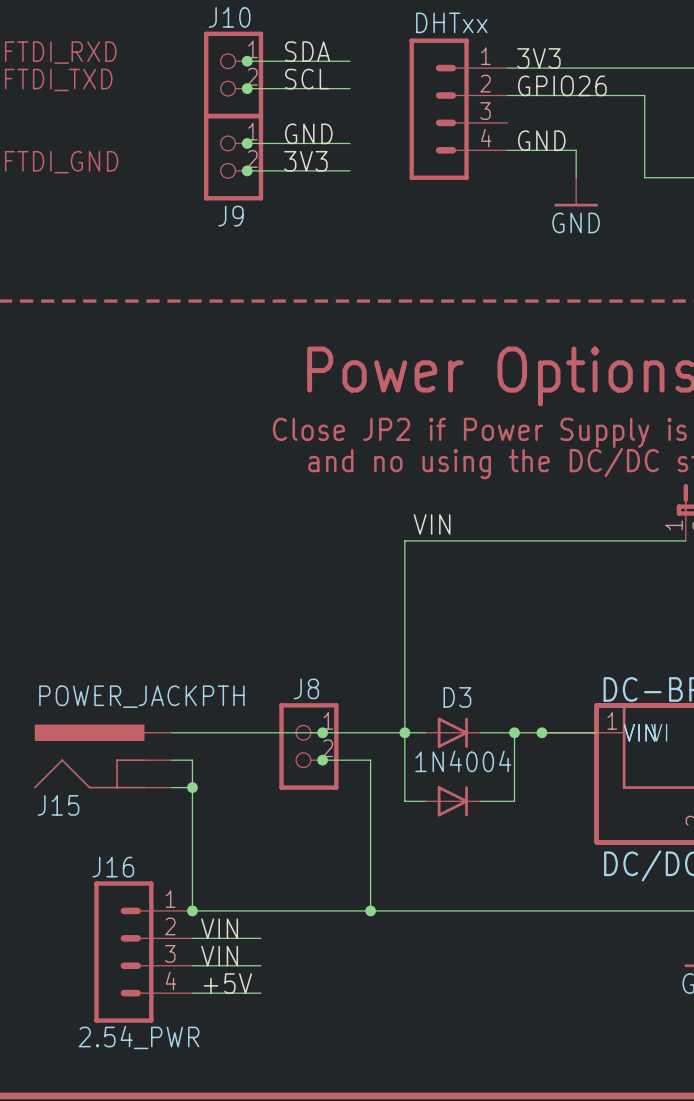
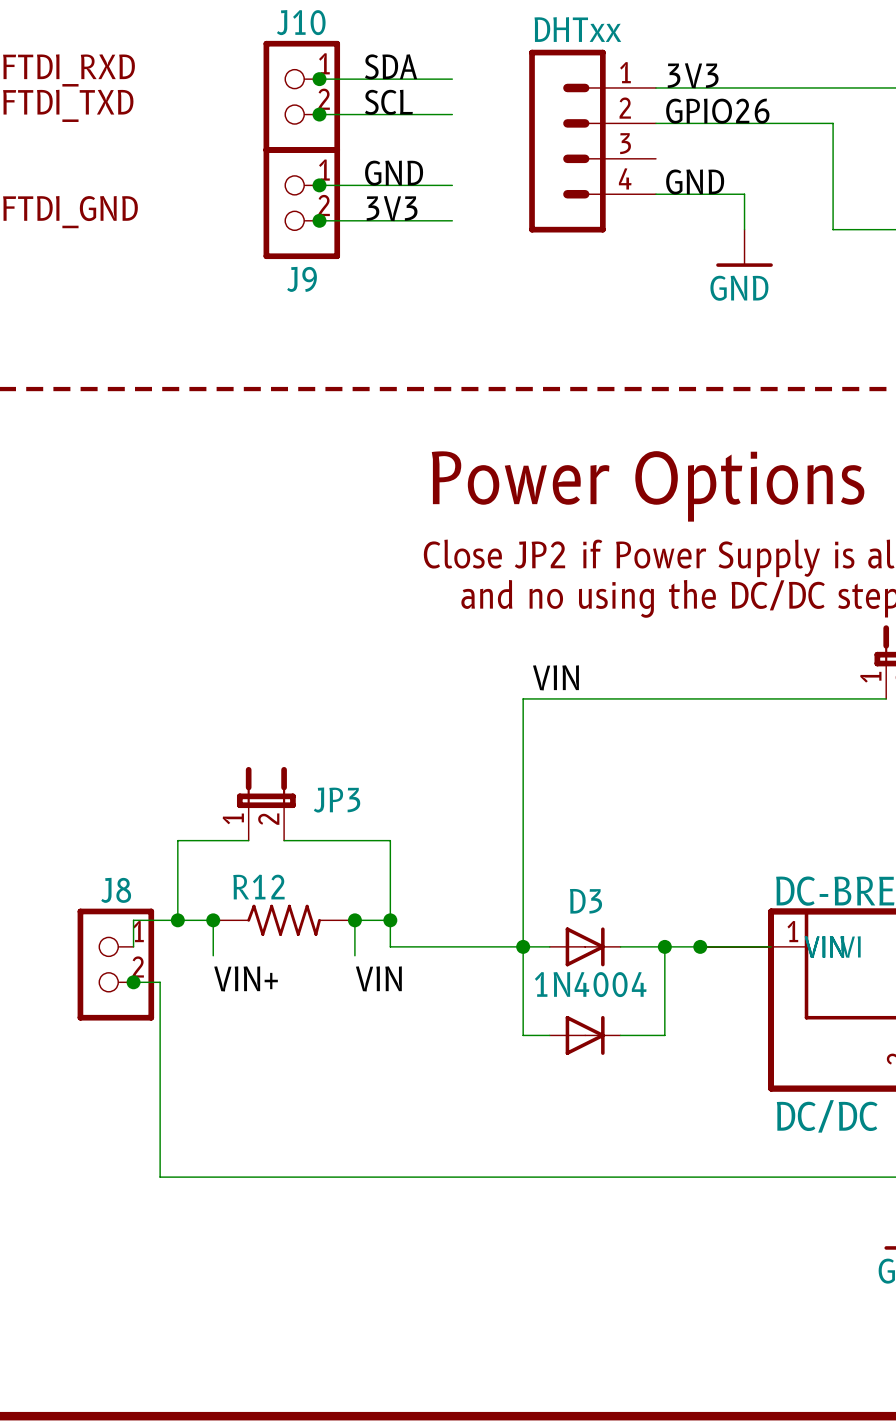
JP3: none -> (266, 803)
wire: none -> (248, 840) (177, 840) (177, 920)
junction: none -> (177, 920)
junction: none -> (213, 920)
R12: none -> (284, 920)
junction: none -> (354, 920)
wire: none -> (390, 920) (354, 920) (354, 955)
junction: none -> (390, 920)
wire: none -> (133, 946) (133, 920) (213, 920) (213, 955)
wire: (171, 732) (302, 732) -> (284, 840) (390, 840) (390, 946)
junction: (322, 732) -> none
J8 position: (308, 746) -> (115, 964)
J15: POWER_JACKPTH (102, 756) -> none
label: none -> VIN+ (246, 978)
label: none -> VIN (378, 978)
junction: none -> (133, 982)
wire: (171, 760) (192, 760) (192, 910) -> (133, 982) (160, 982) (160, 1177) (248, 1177)
wire: (322, 760) (370, 760) (370, 910) -> none
junction: (322, 760) -> none
wire: (171, 787) (192, 787) -> none
junction: (192, 787) -> none
junction: (192, 910) -> none
junction: (370, 910) -> none
label: VIN (219, 928) -> none
wire: (192, 938) (260, 938) -> none
J16: 2.54_PWR (143, 952) -> none
label: VIN (219, 956) -> none
wire: (192, 965) (260, 965) -> none
label: +5V (227, 983) -> none
wire: (192, 993) (260, 993) -> none

